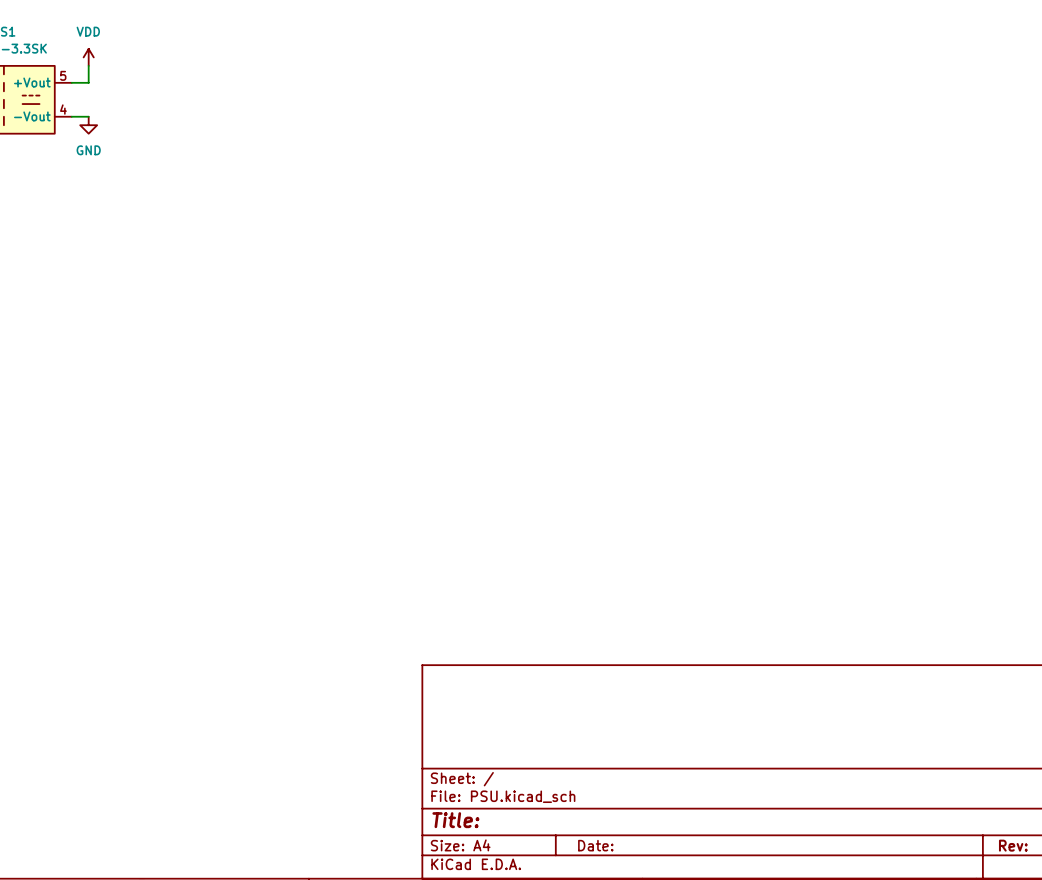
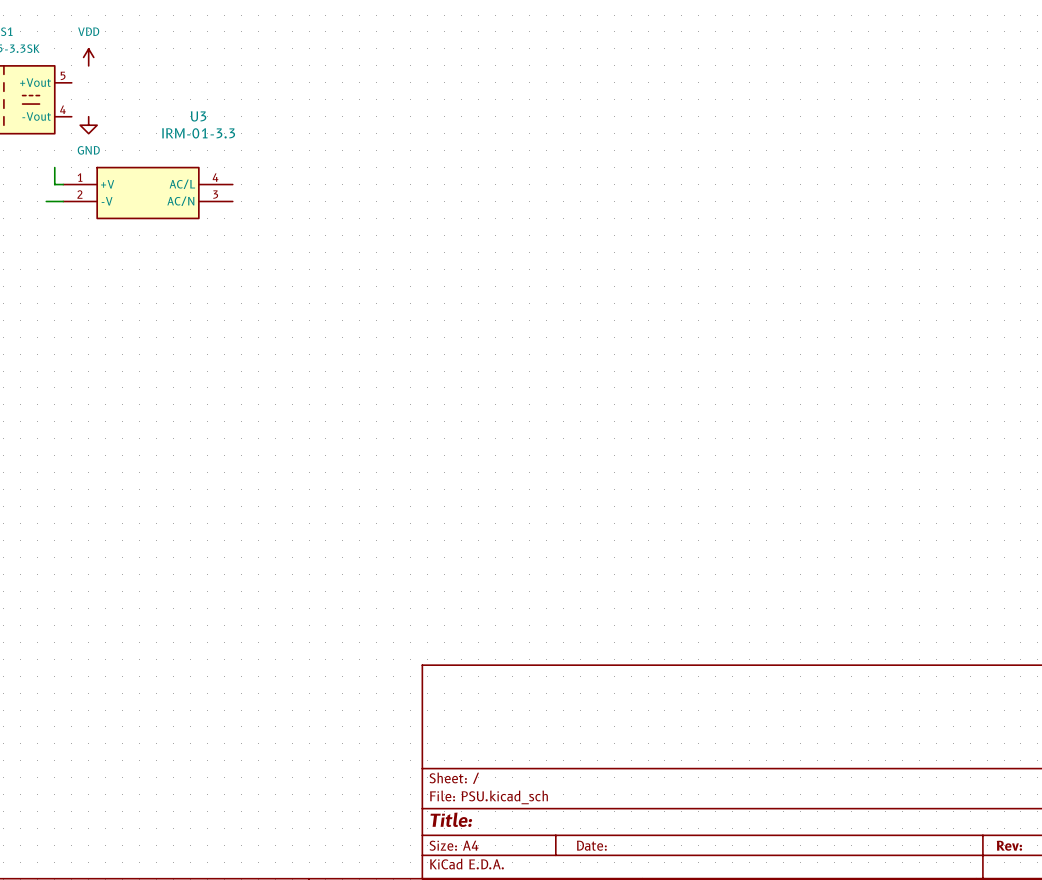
wire: (88, 65) (88, 82) (71, 82) -> none
wire: (71, 116) (88, 116) -> (46, 201) (63, 201)
wire: none -> (54, 167) (54, 184) (63, 184)
U3: none -> IRM-01-3.3 (148, 193)

